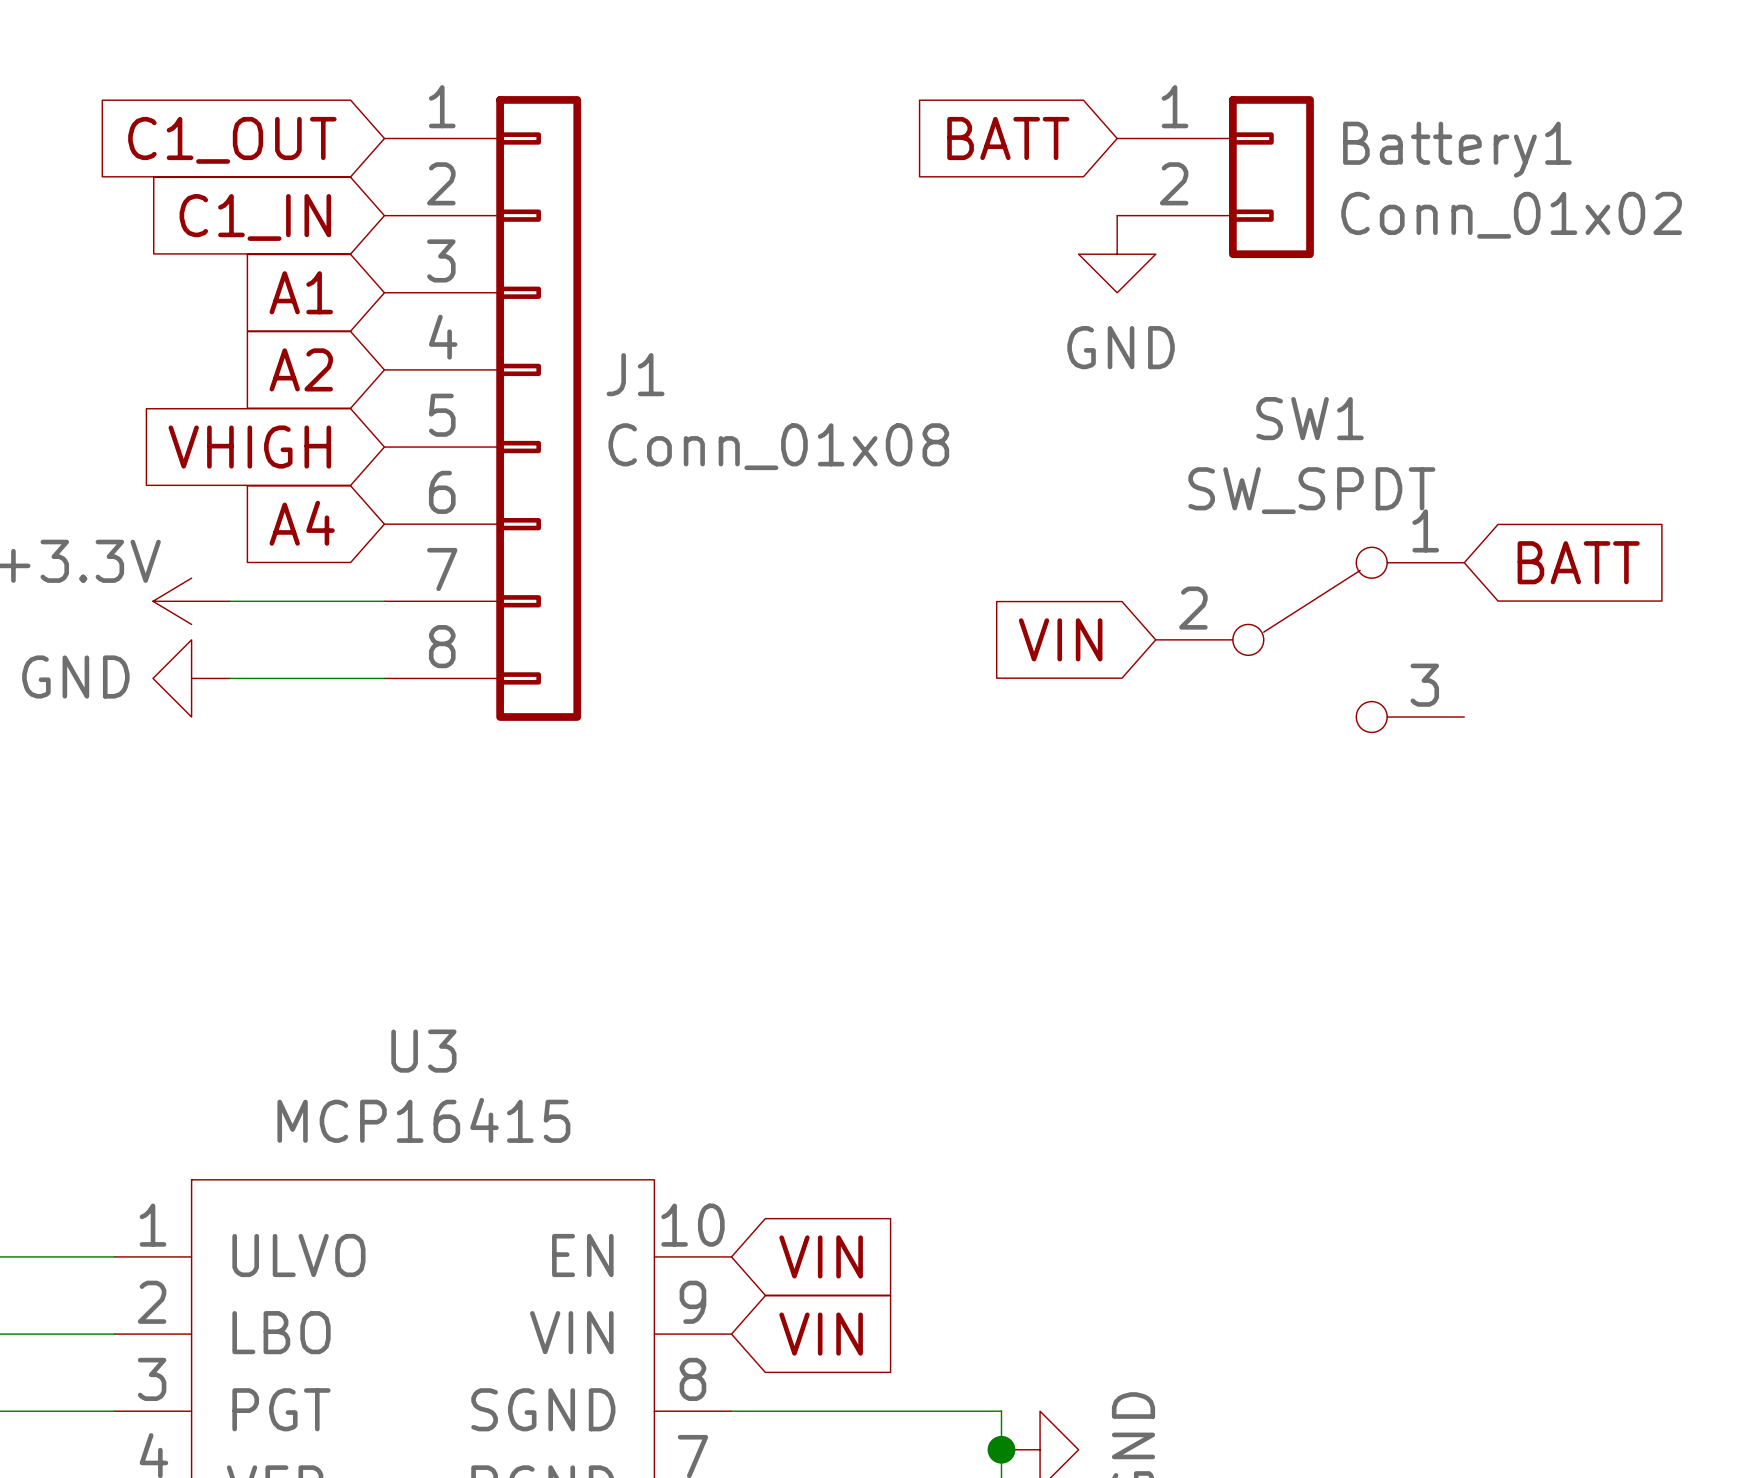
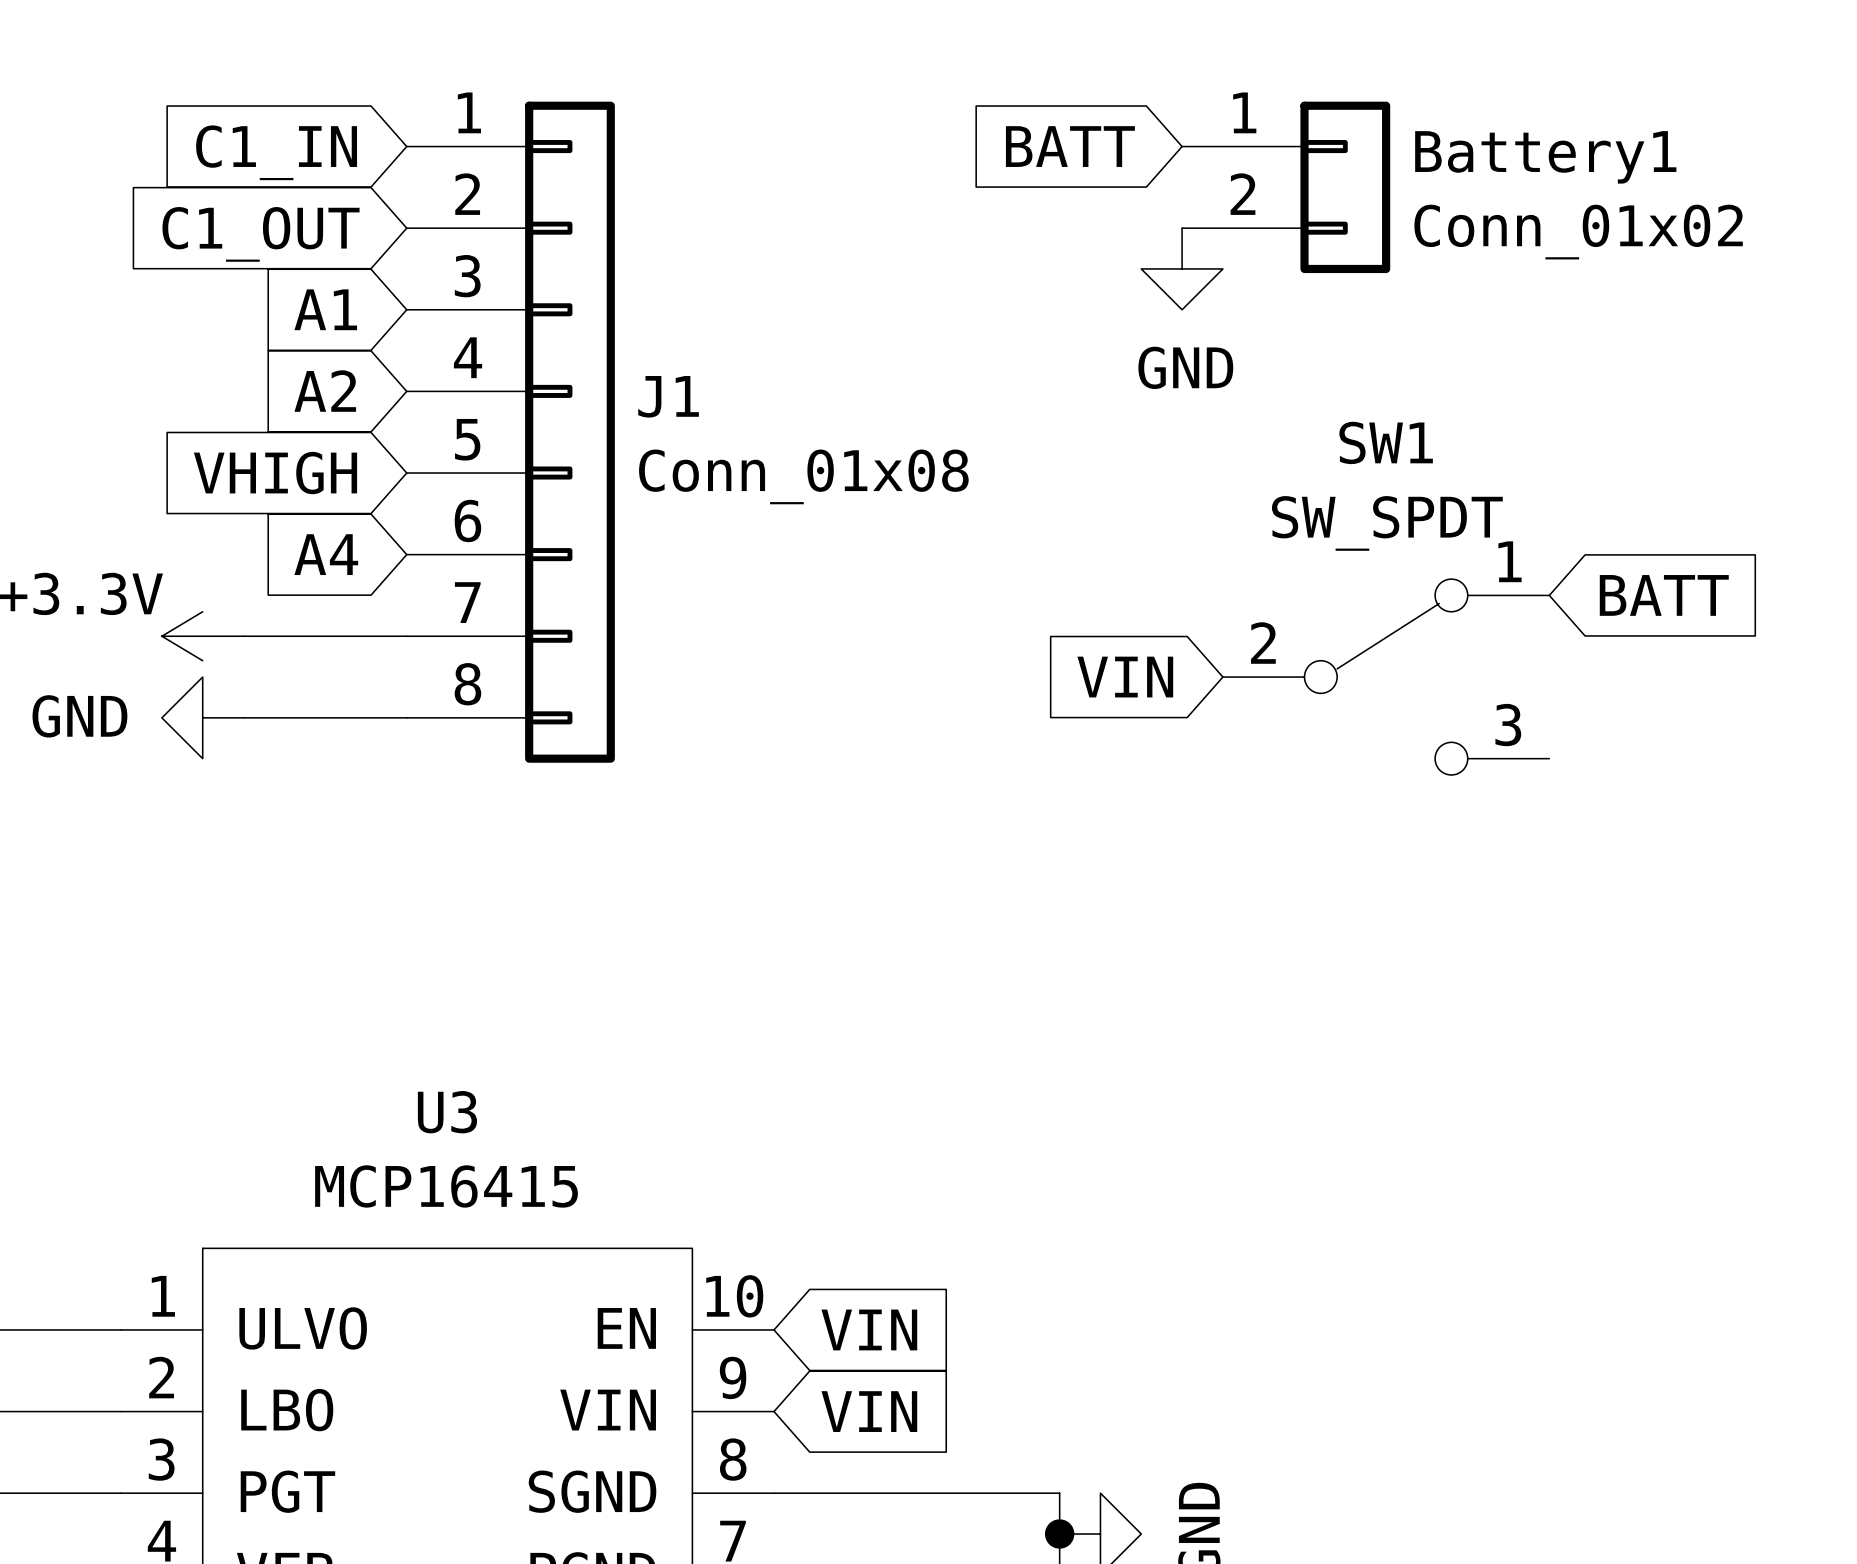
global label: C1_OUT (232, 140) -> C1_IN (276, 152)
global label: C1_IN (255, 217) -> C1_OUT (261, 234)

